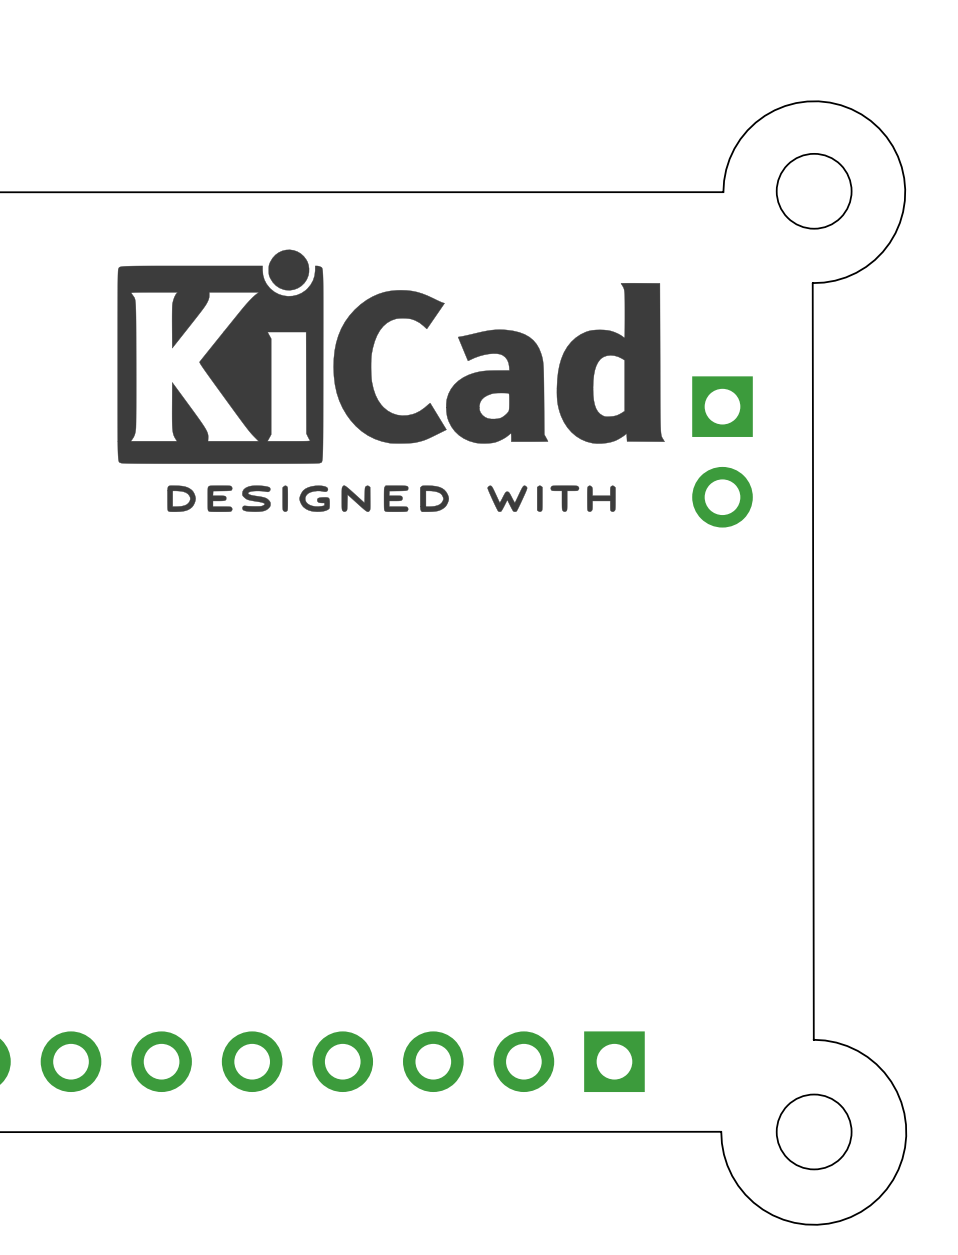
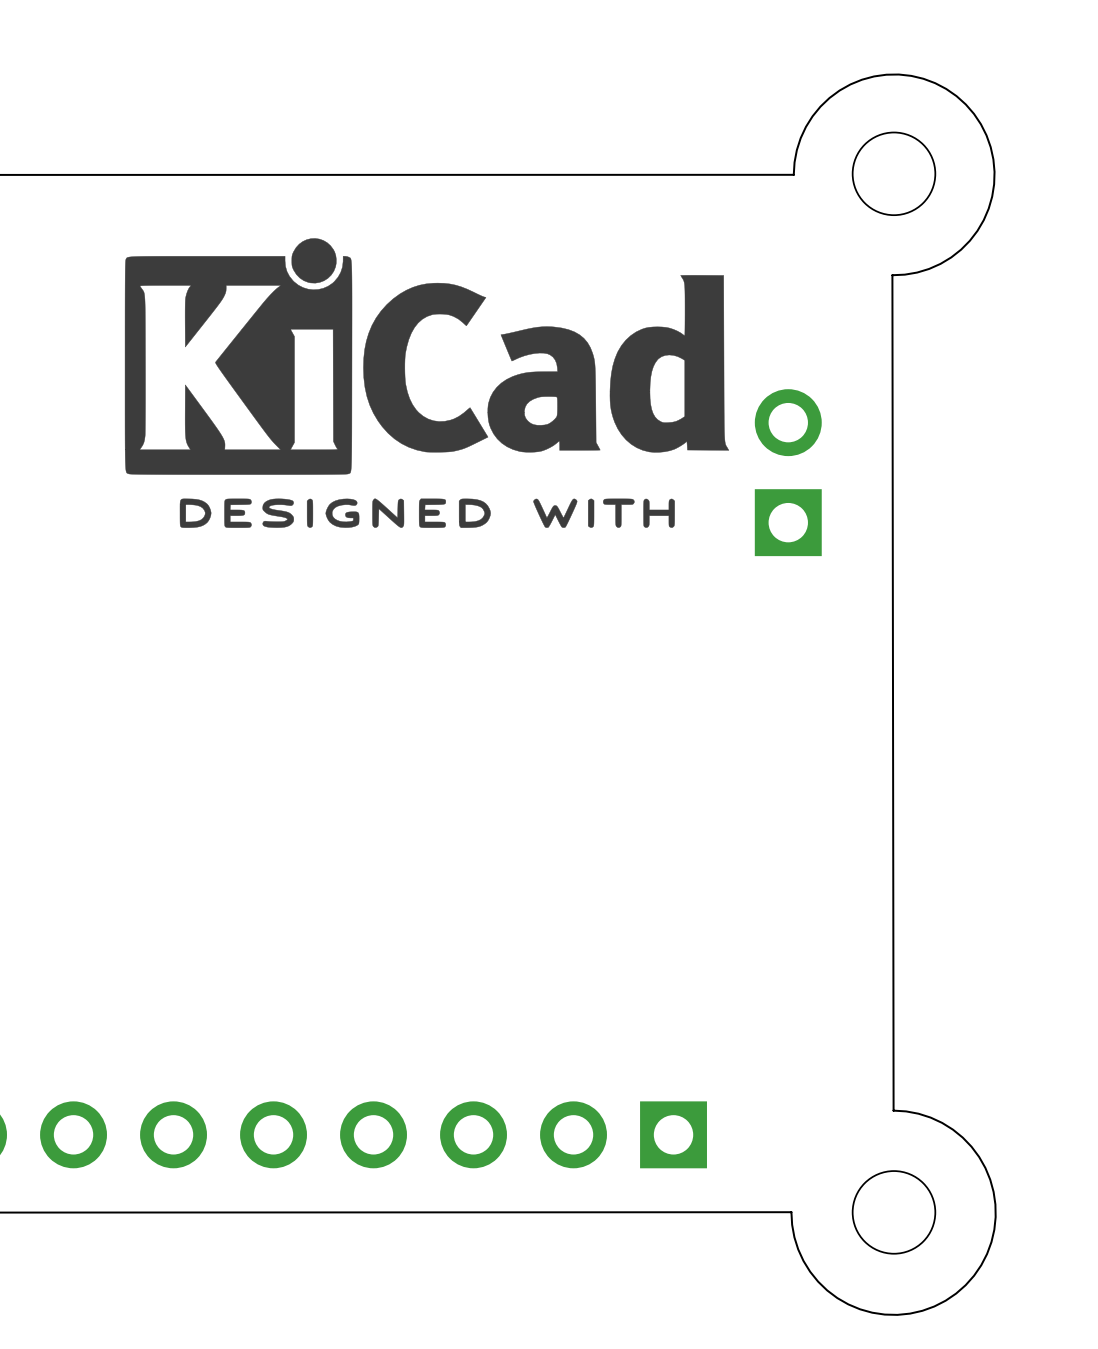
part rotation: 0° (722, 451) -> 180° (788, 472)

